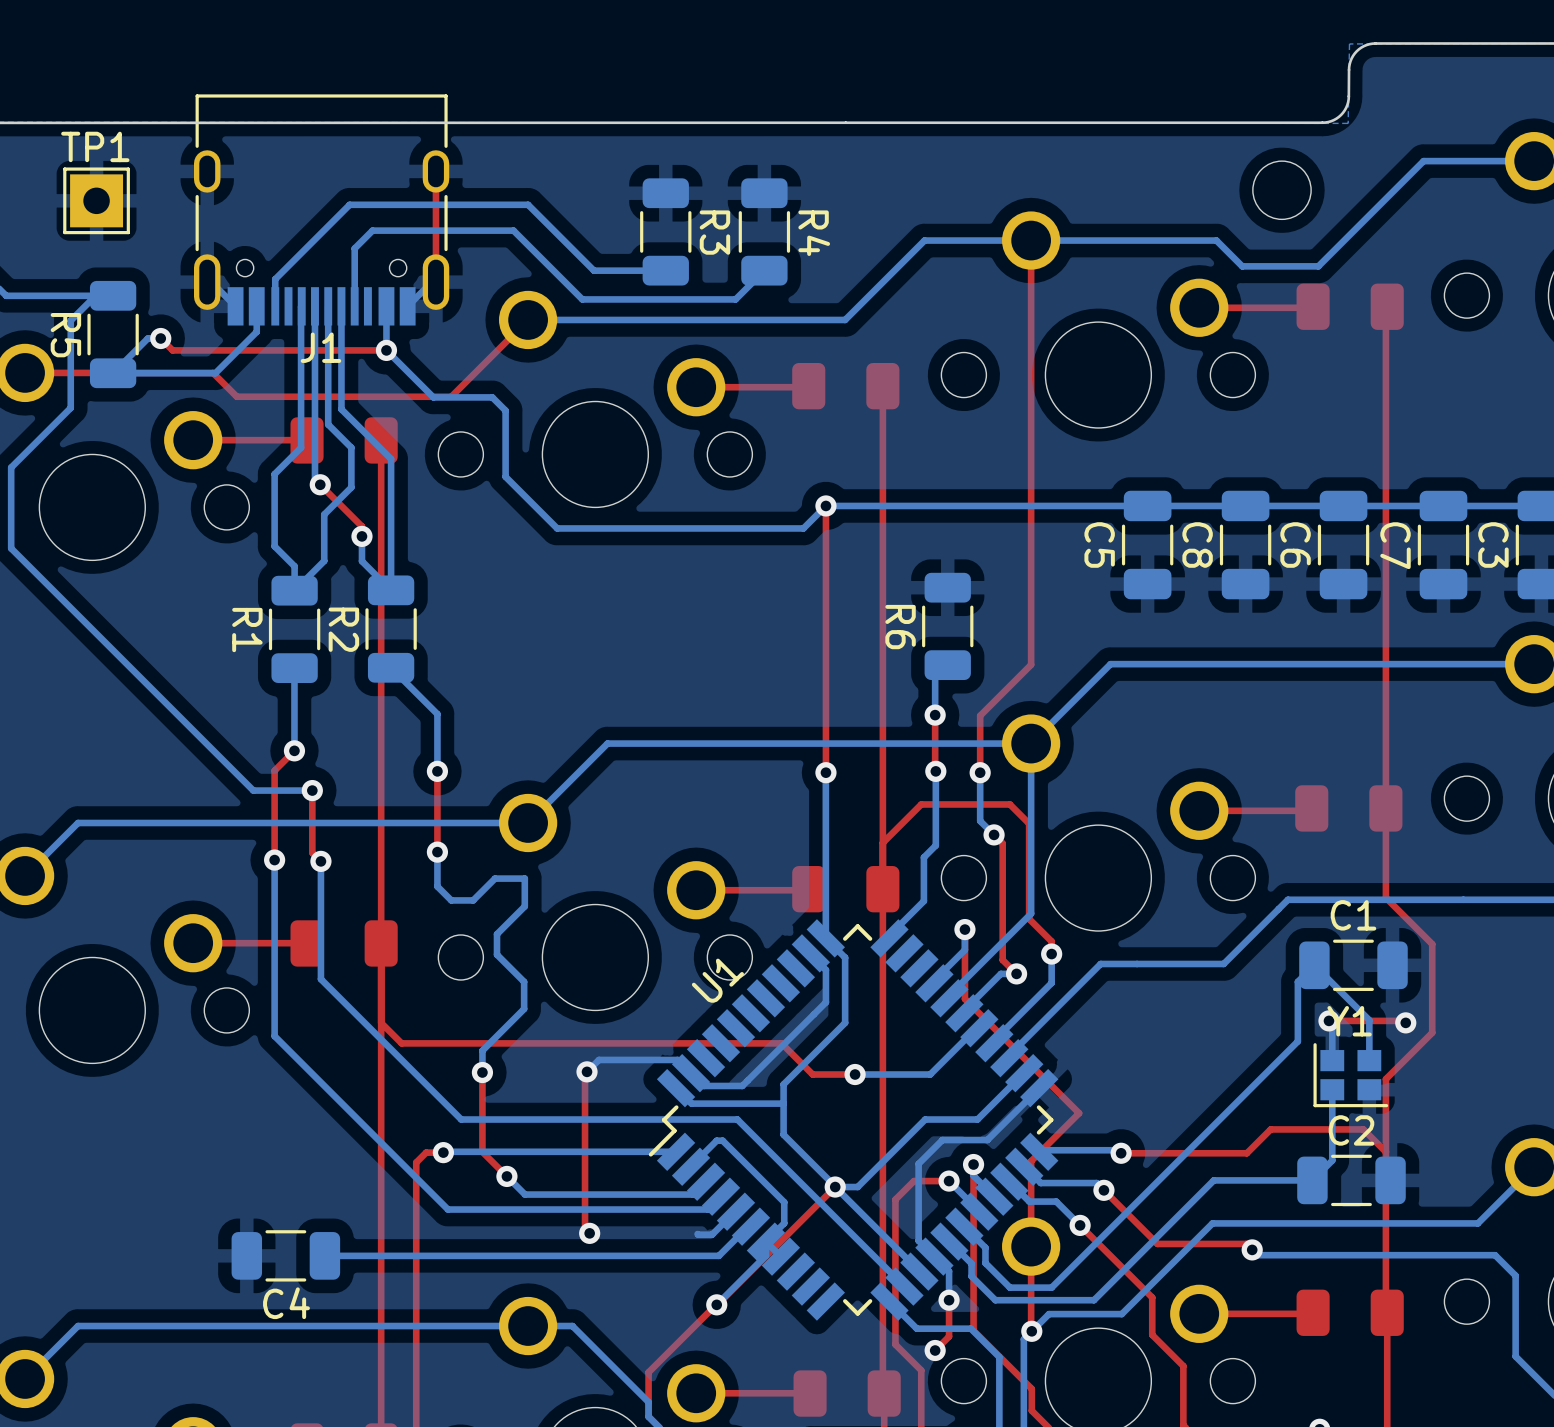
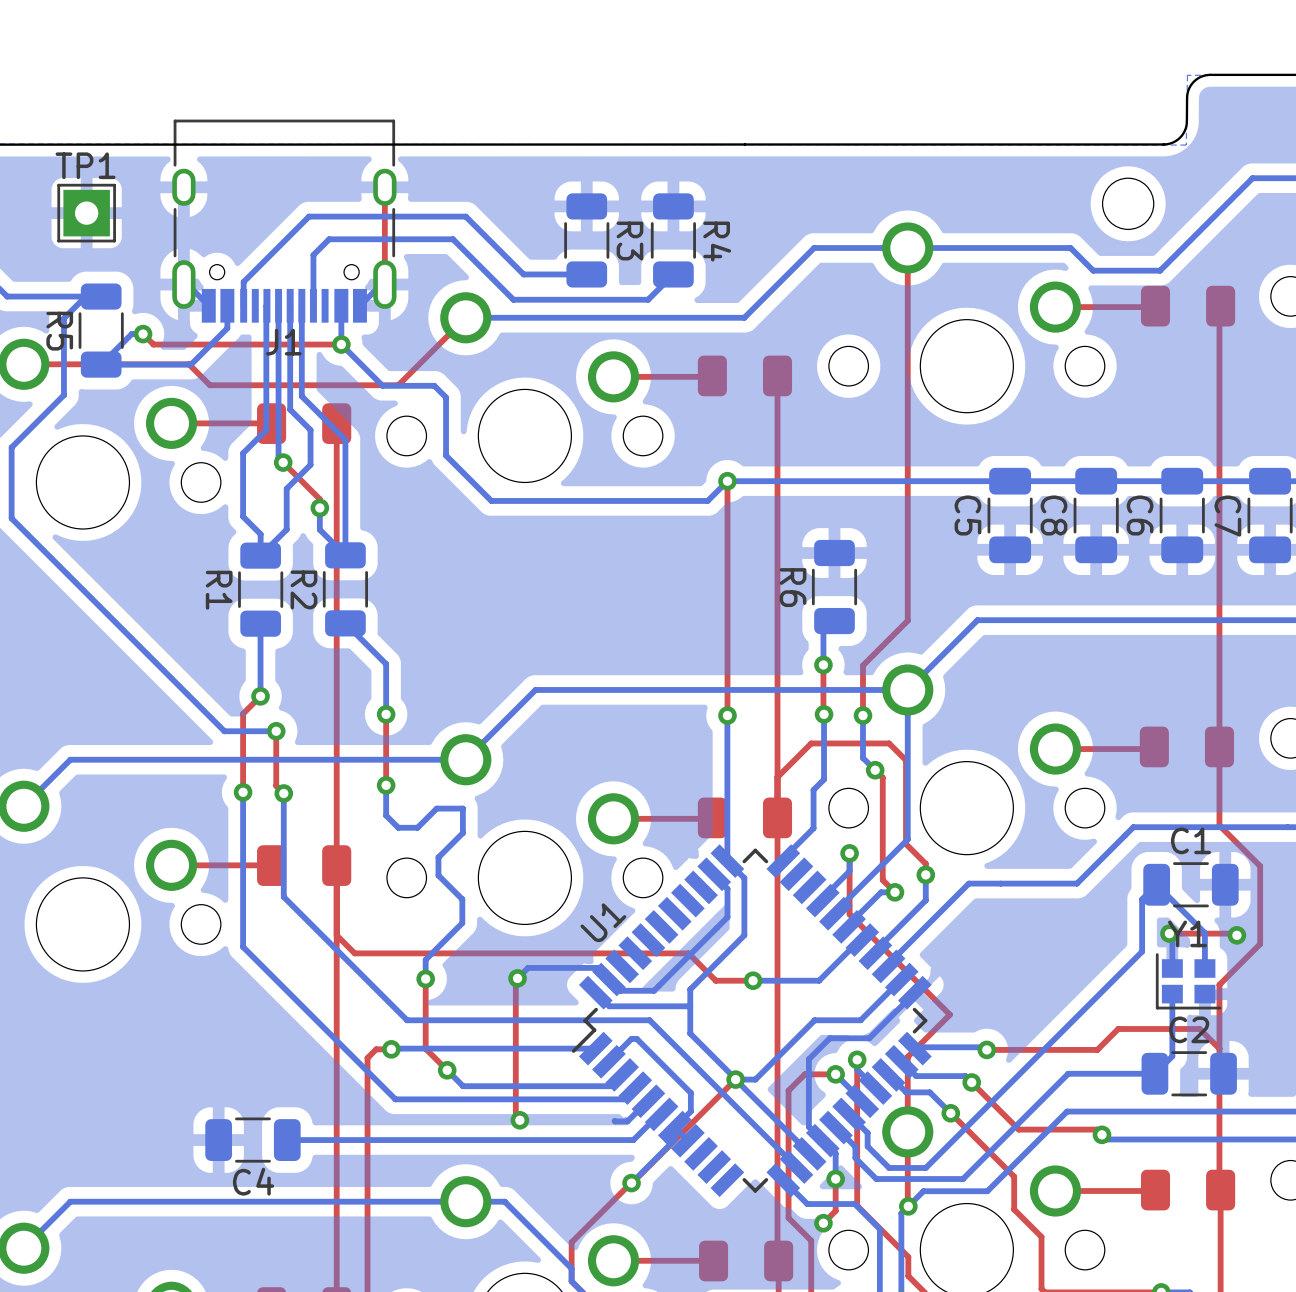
U1 name position: U1 (717, 980) -> U1 (603, 922)

